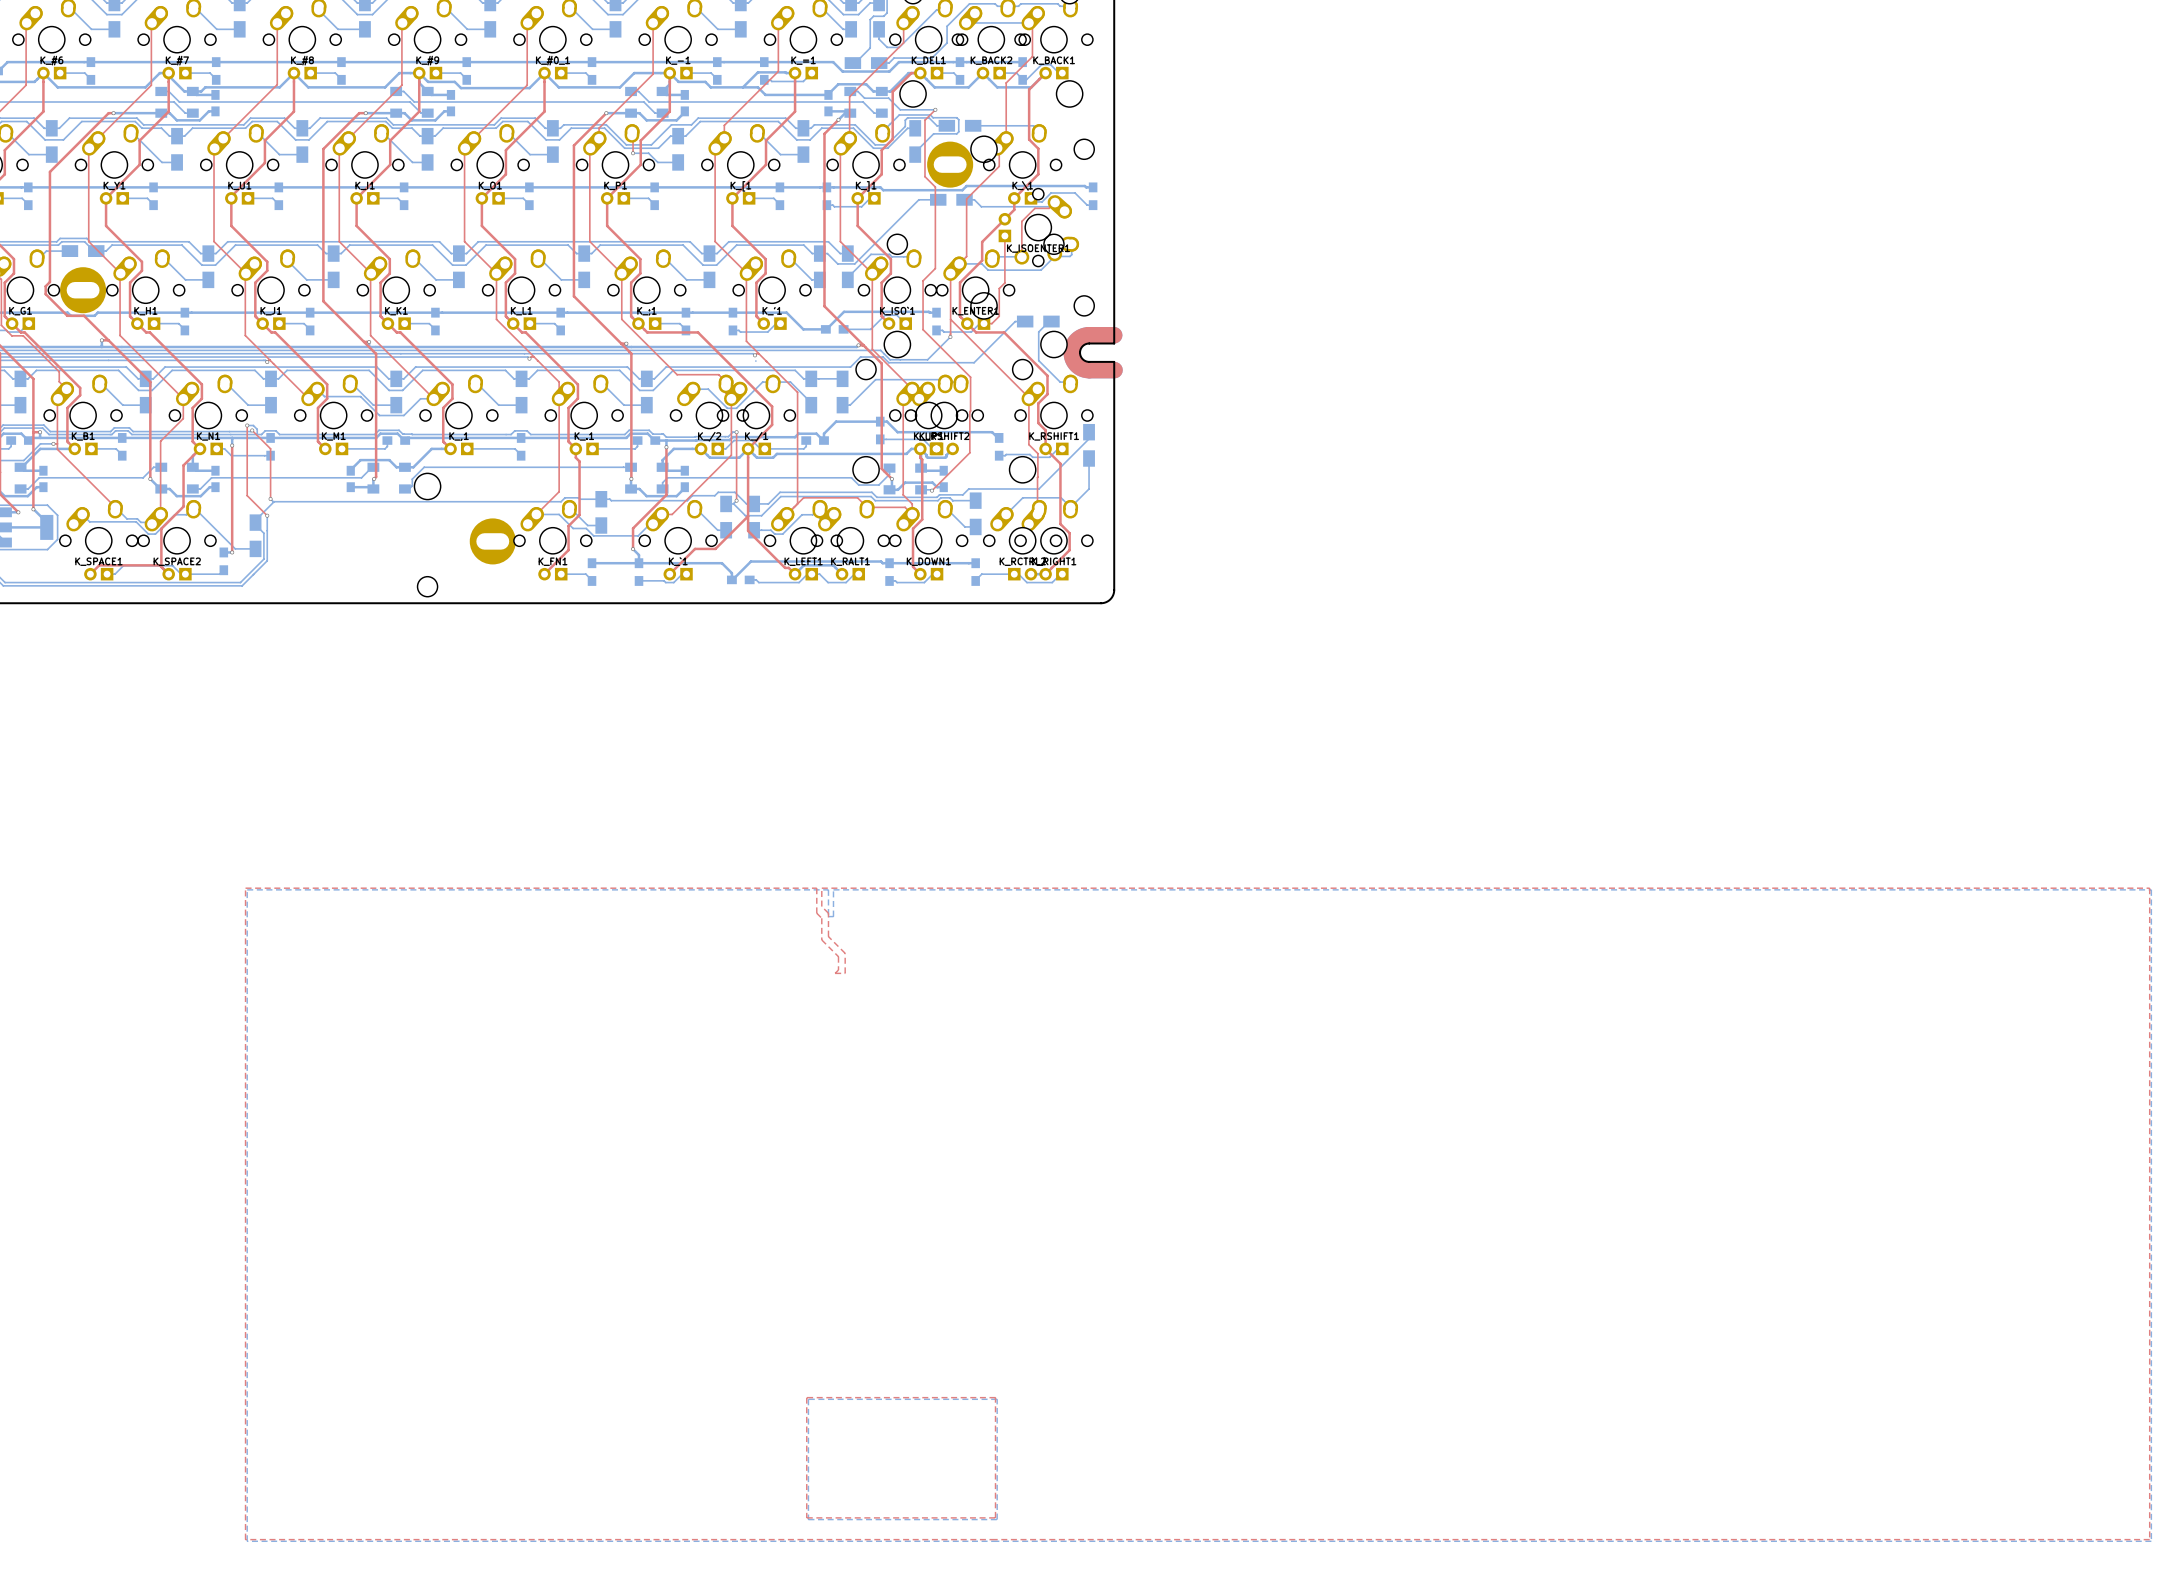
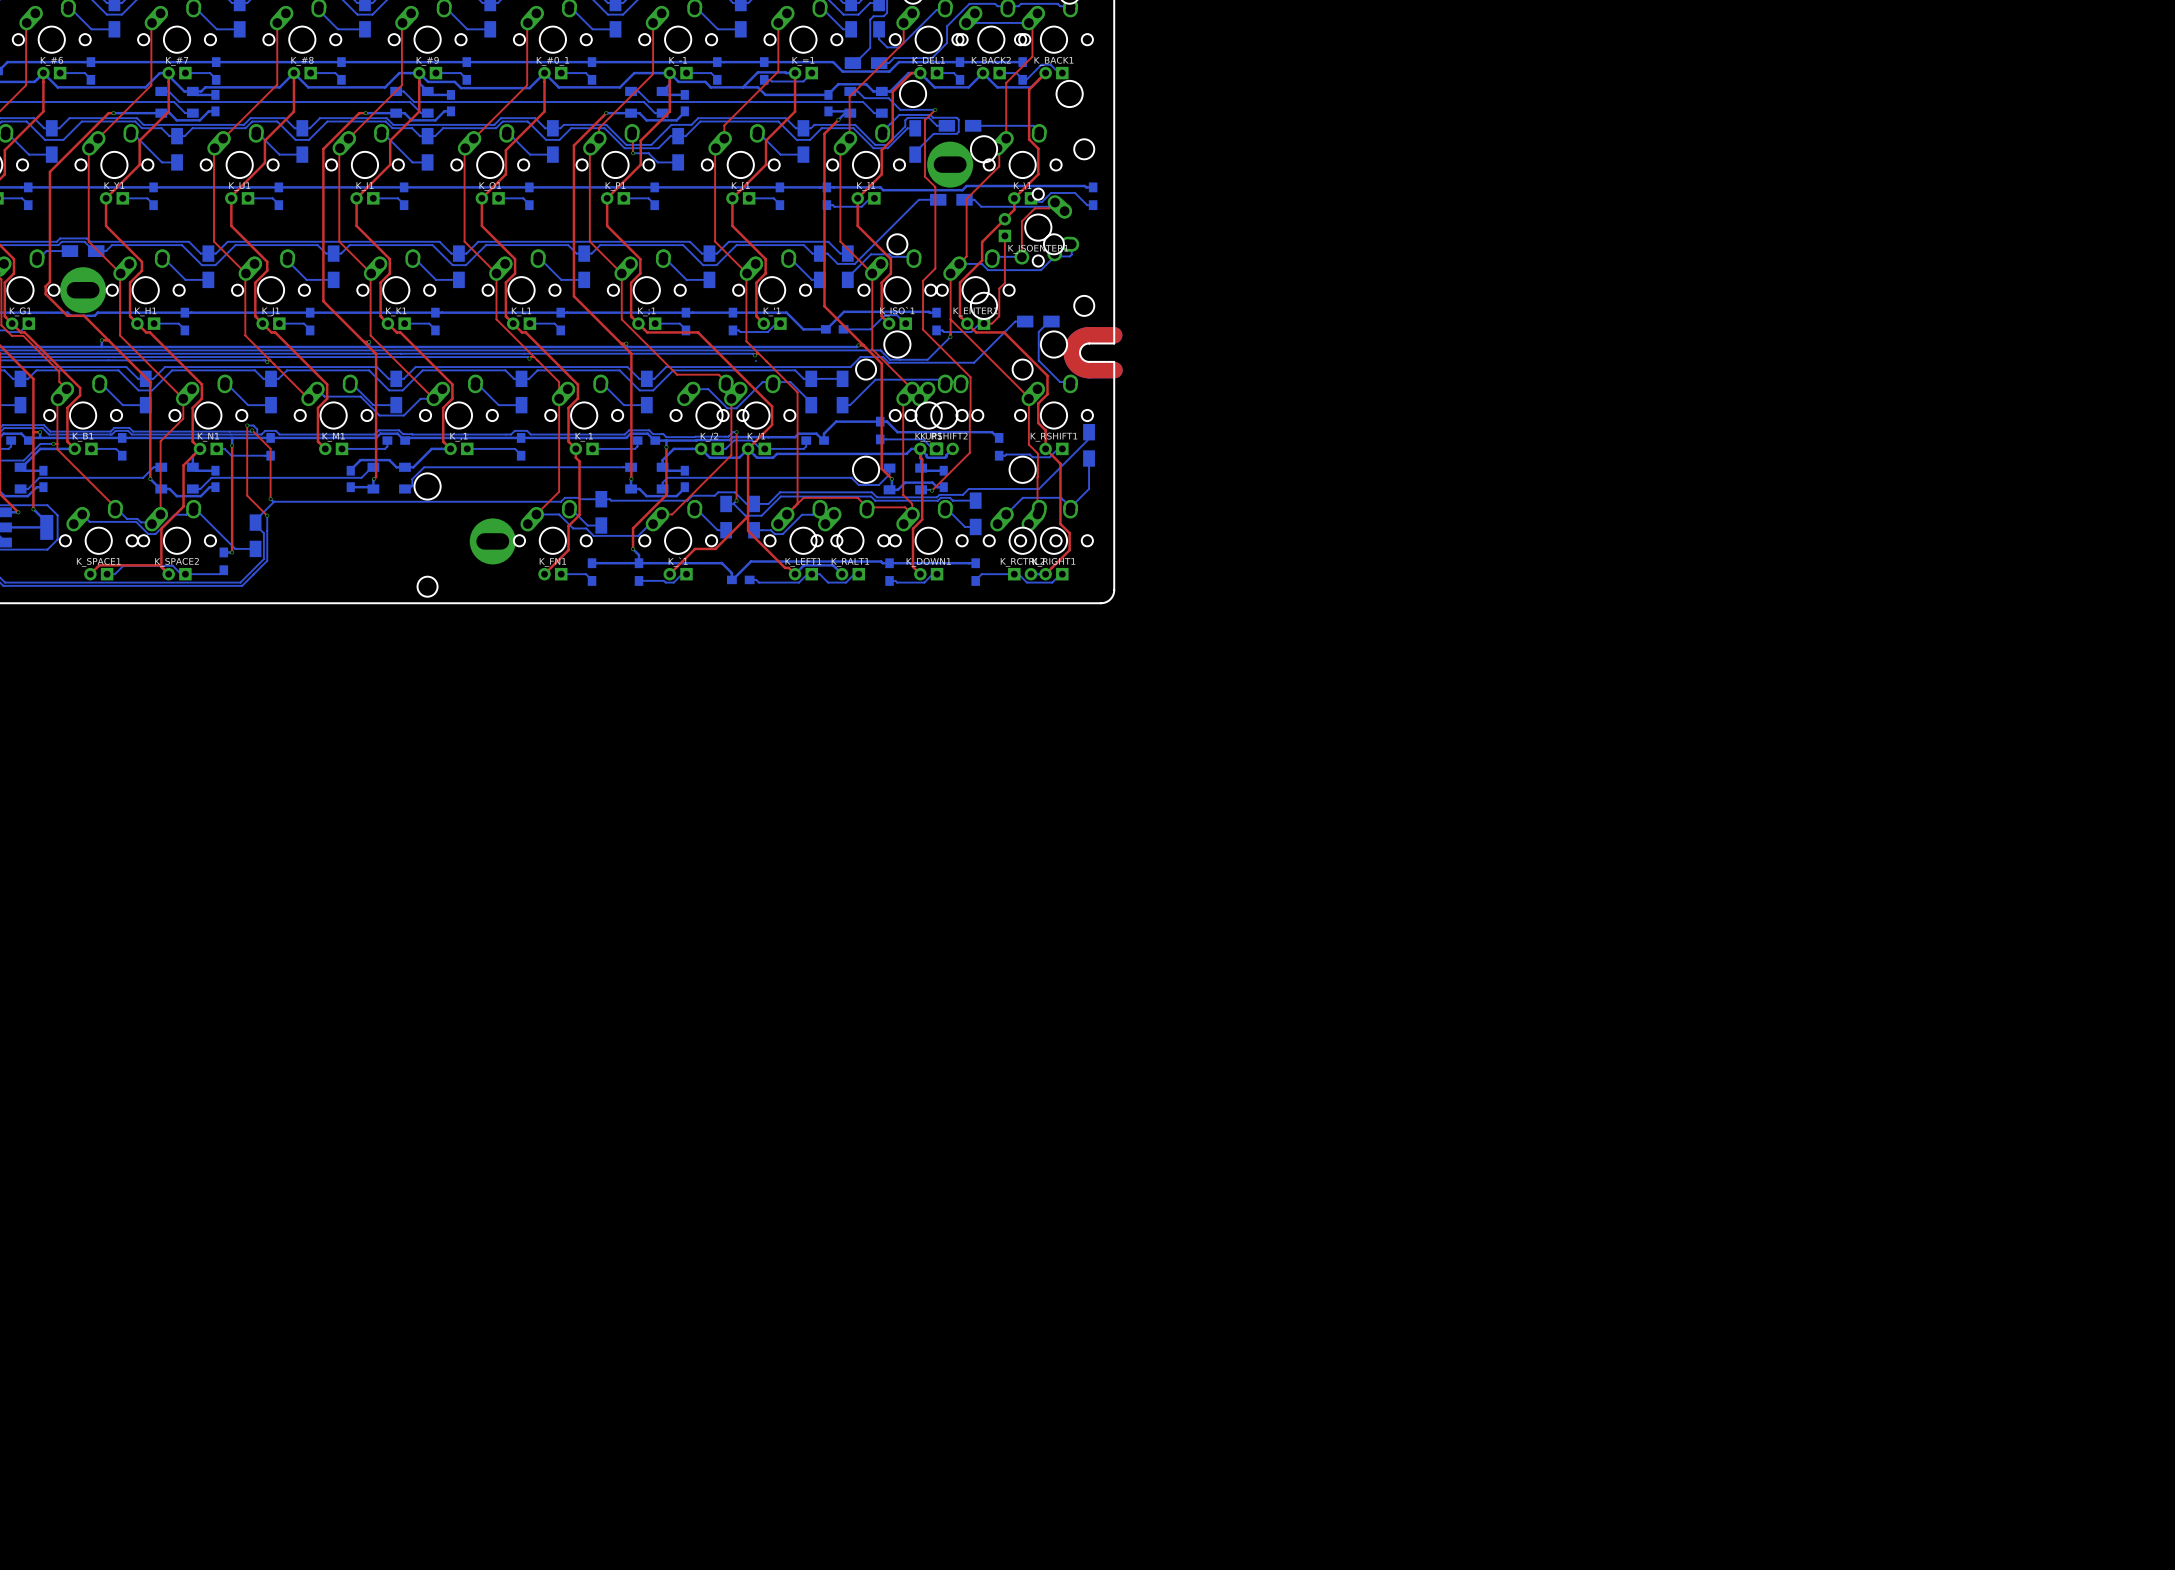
top zone outline: (245, 888) (816, 888) (816, 913) (821, 918) (821, 939) (838, 956) (838, 970) (835, 973) (845, 973) (845, 953) (828, 936) (828, 913) (821, 906) (821, 888) (2149, 888) (2149, 1539) (245, 1539) (245, 888) -> none
bottom zone outline: (247, 889) (828, 889) (828, 916) (833, 916) (833, 889) (2151, 889) (2151, 1541) (247, 1541) (247, 889) -> none
top zone outline: (806, 1397) (995, 1397) (995, 1517) (806, 1517) (806, 1397) -> none
bottom zone outline: (808, 1399) (997, 1399) (997, 1519) (808, 1519) (808, 1399) -> none

